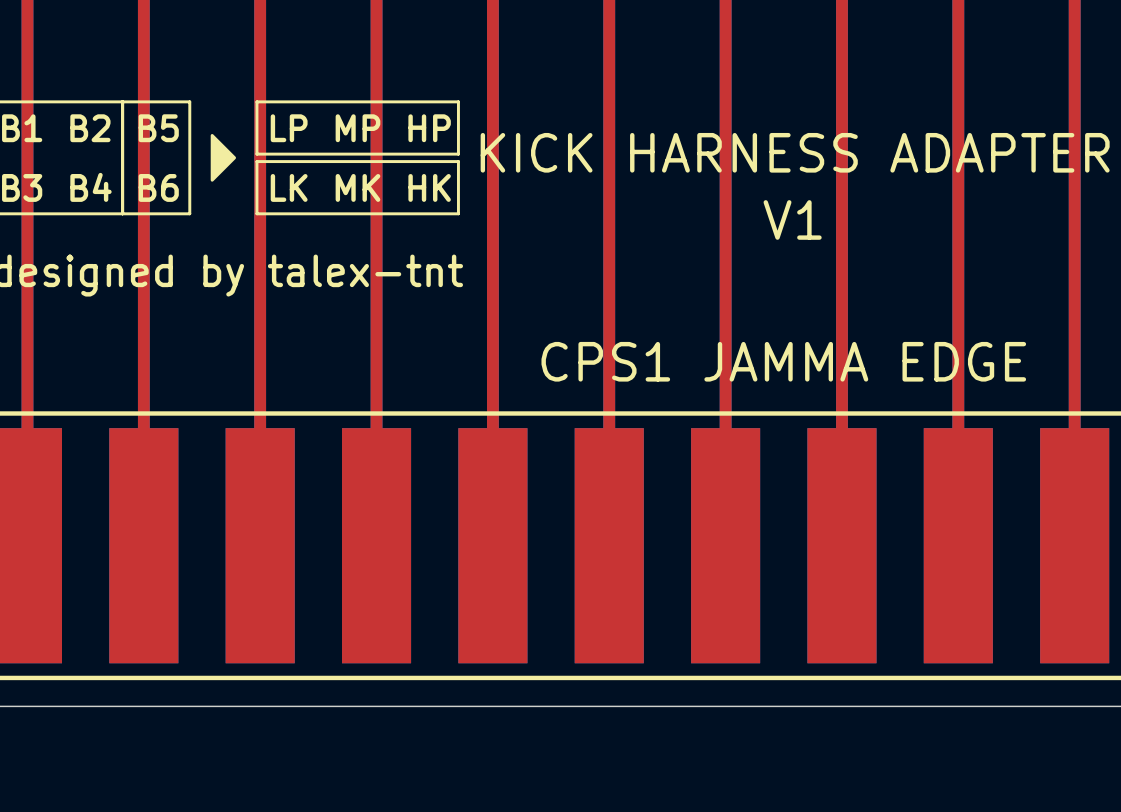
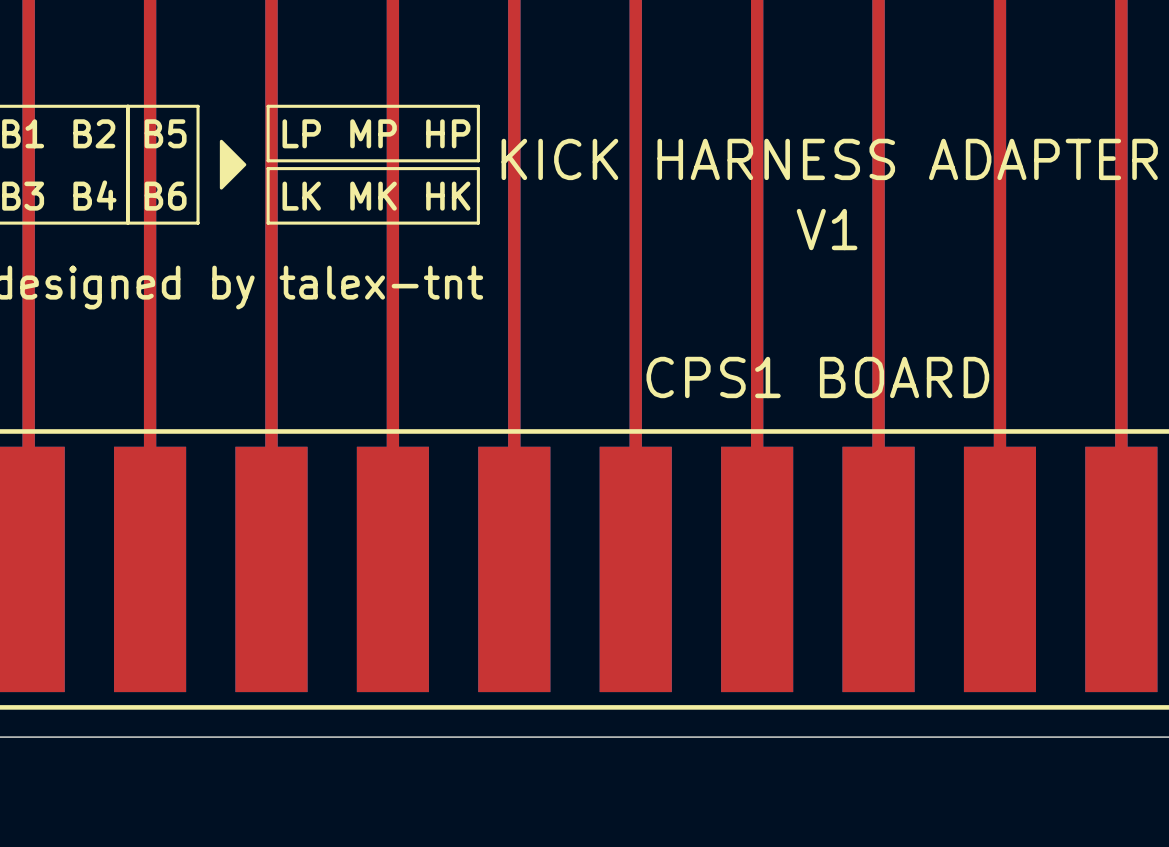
CPS1 JAMMA EDGE name: CPS1 JAMMA EDGE (783, 361) -> CPS1 BOARD (817, 377)

